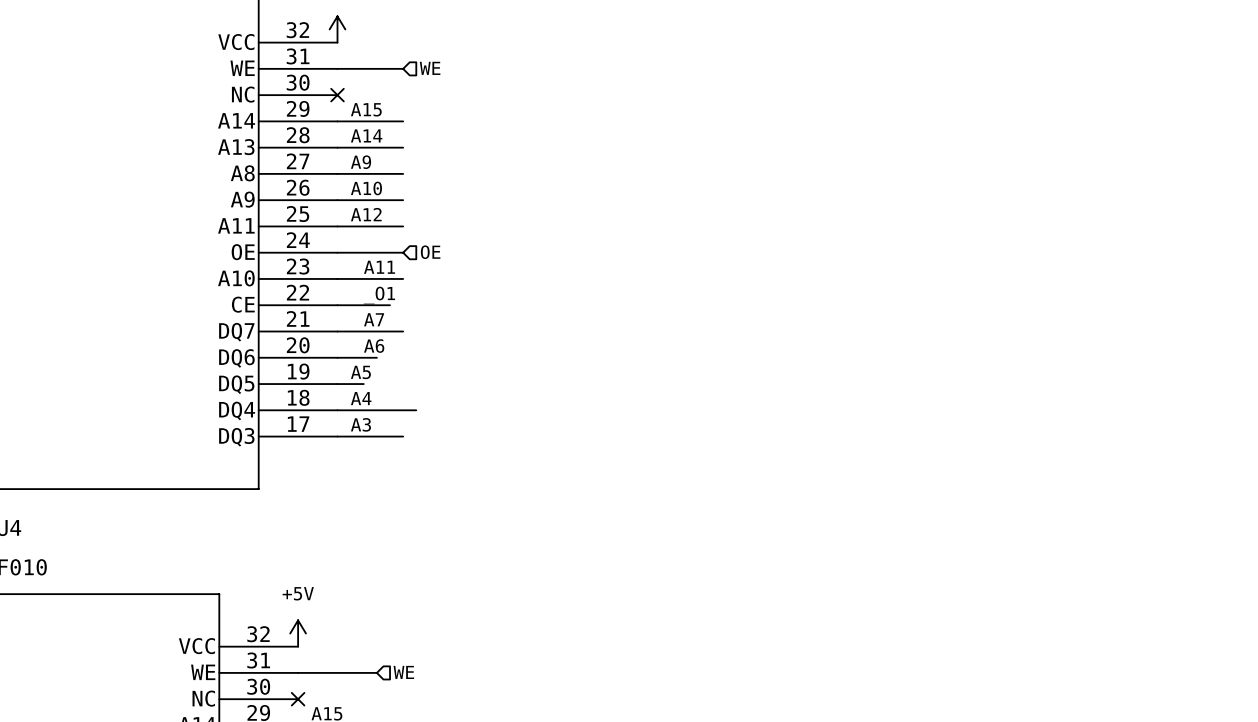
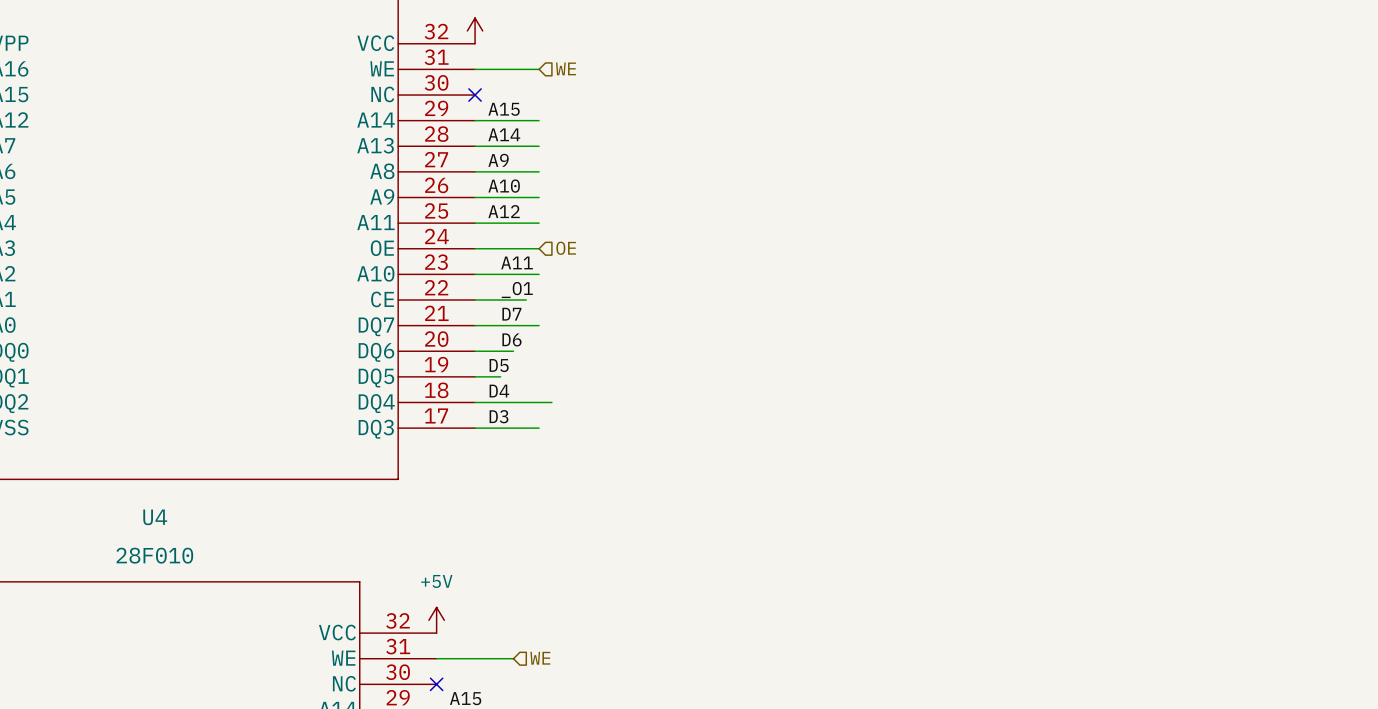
label: A7 (374, 319) -> D7 (511, 314)
label: A6 (374, 346) -> D6 (511, 339)
label: A5 (360, 372) -> D5 (499, 365)
label: A4 (361, 398) -> D4 (499, 391)
label: A3 (360, 424) -> D3 (498, 416)

